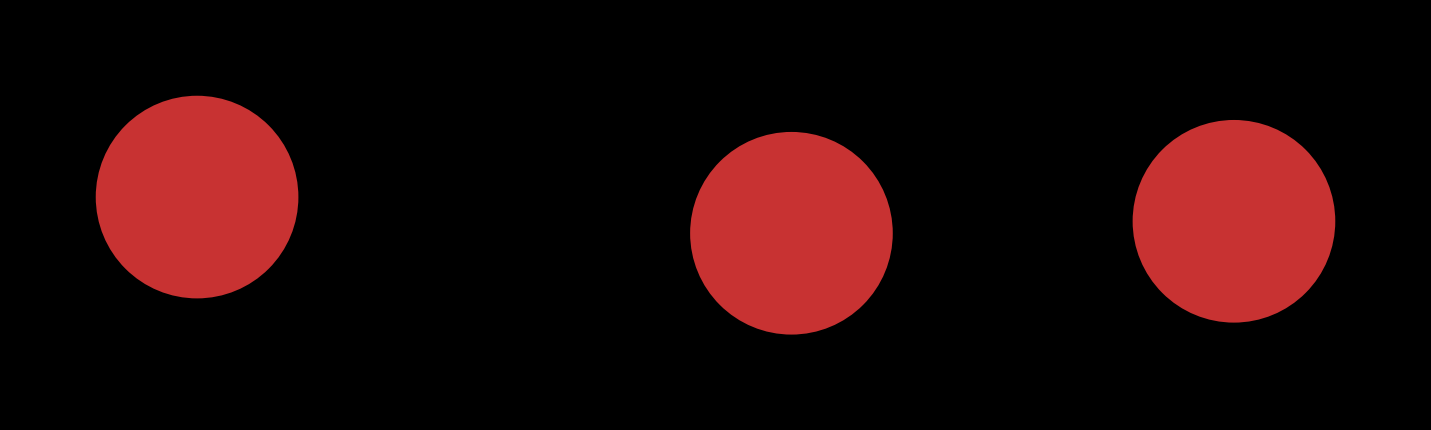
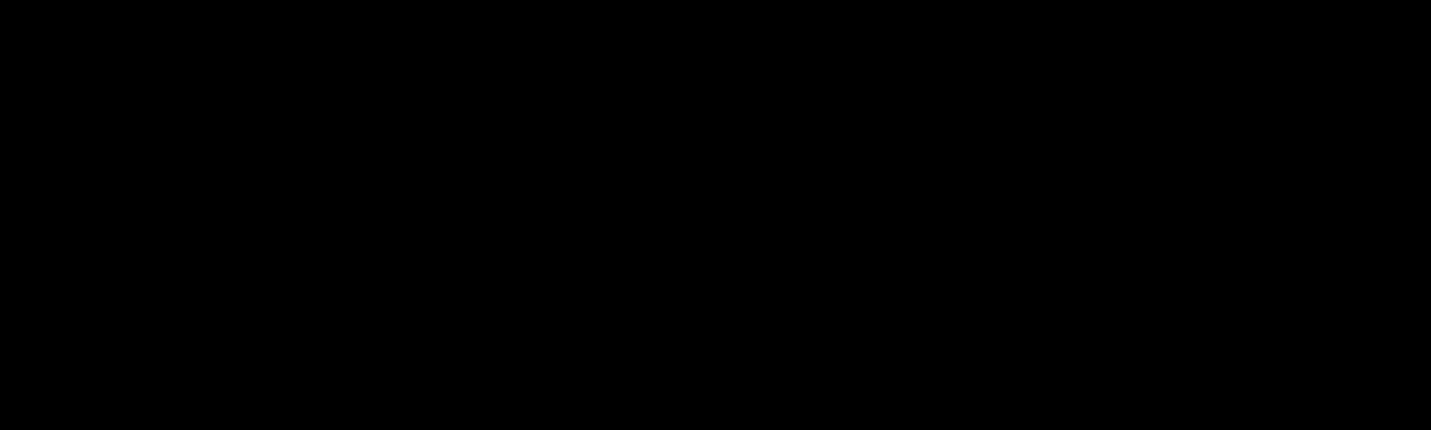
part: (197, 197) -> none
part: (1233, 221) -> none
part: (791, 233) -> none

